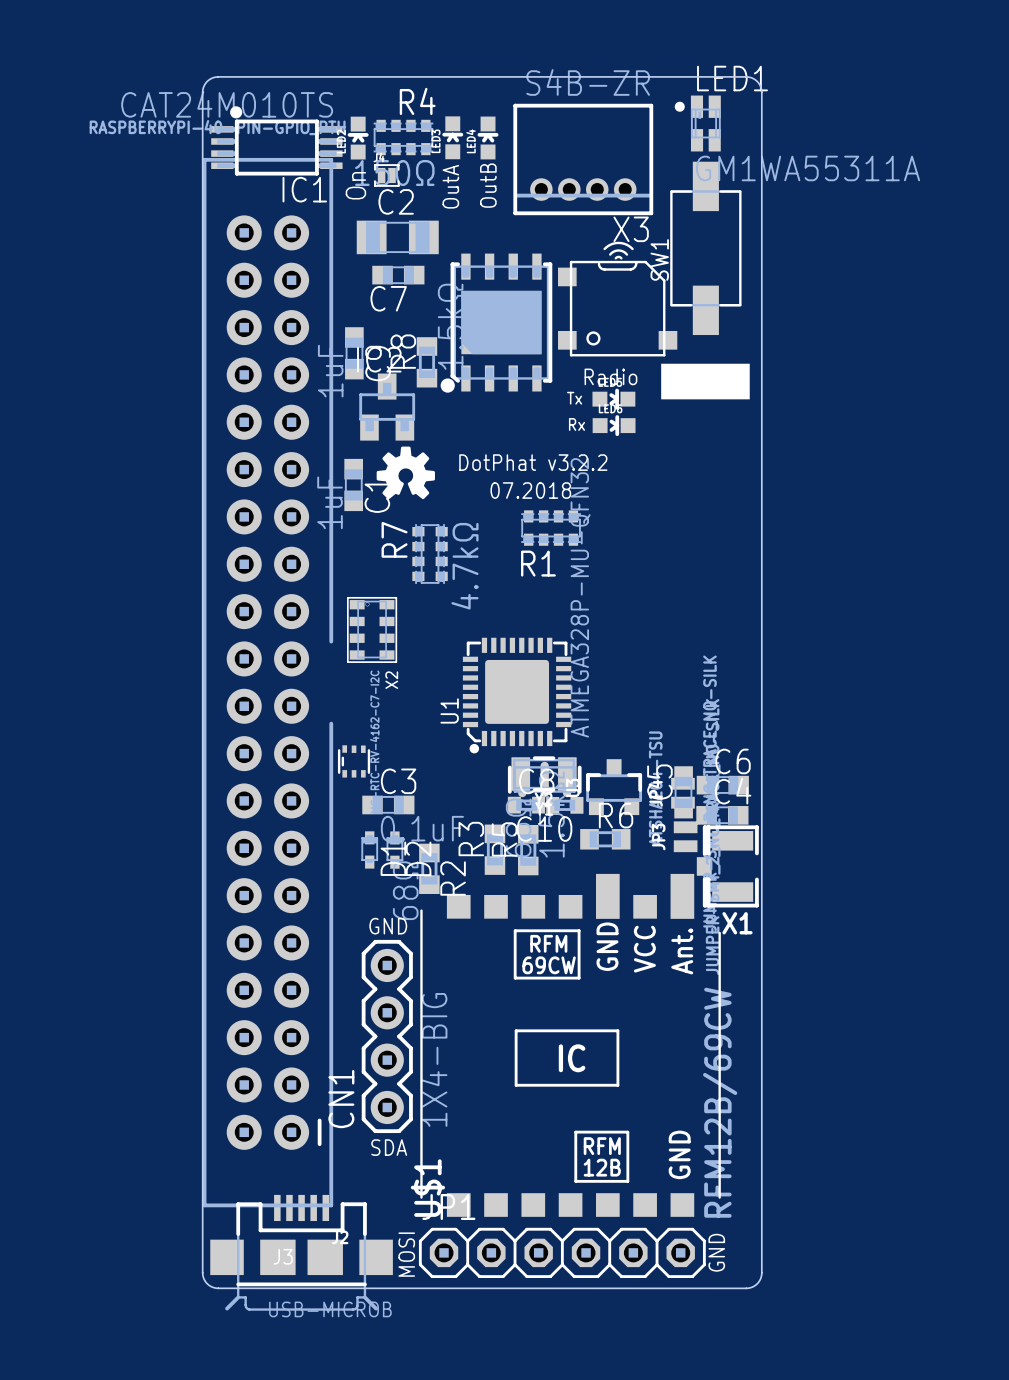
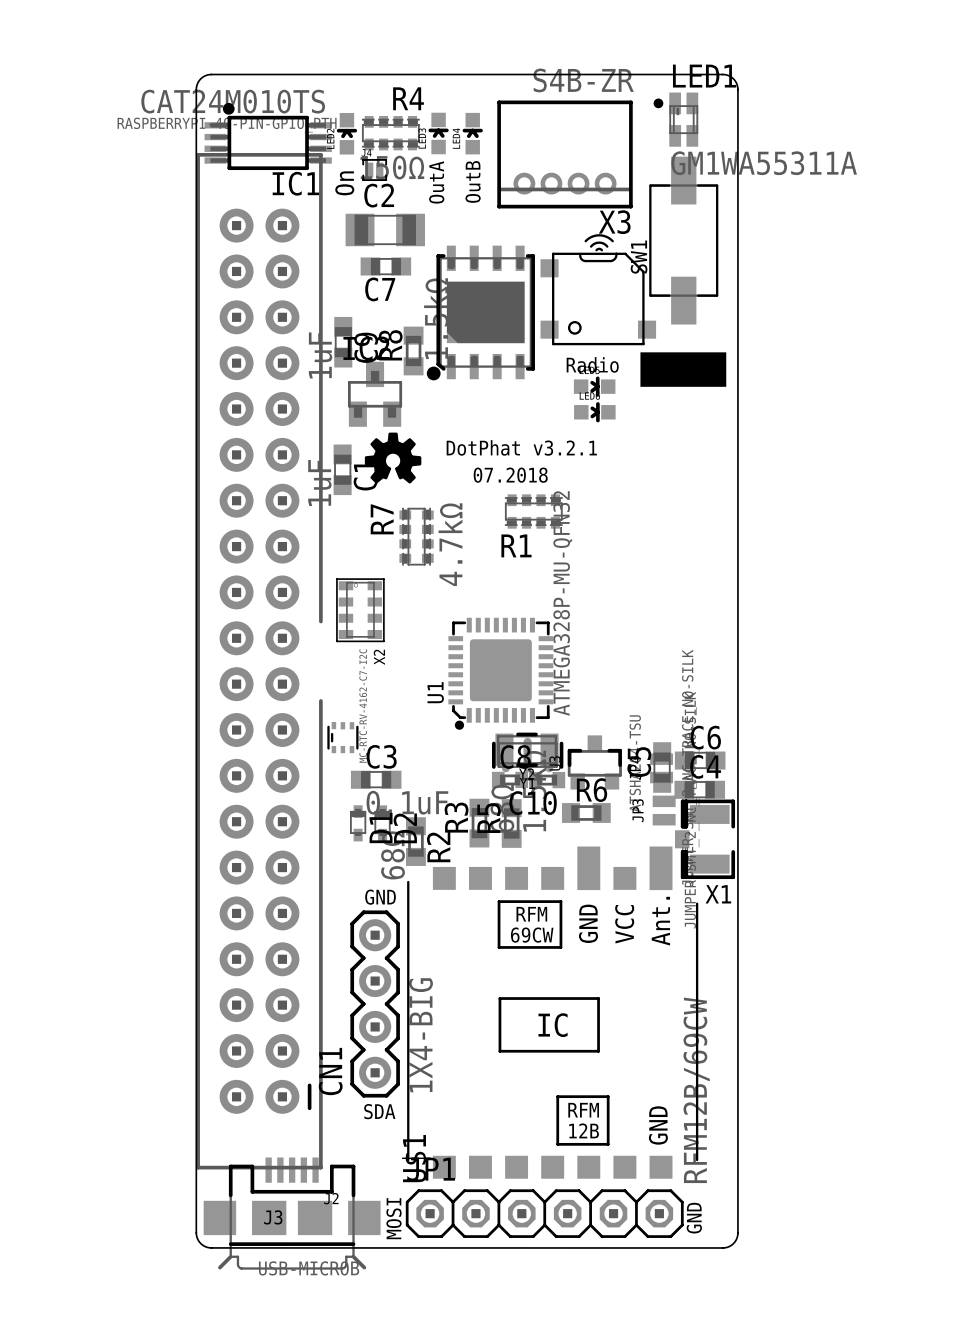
text: Tx (574, 398) -> none
text: Rx (576, 424) -> none
text: DotPhat v3.2.2 (533, 462) -> DotPhat v3.2.1 (521, 447)

